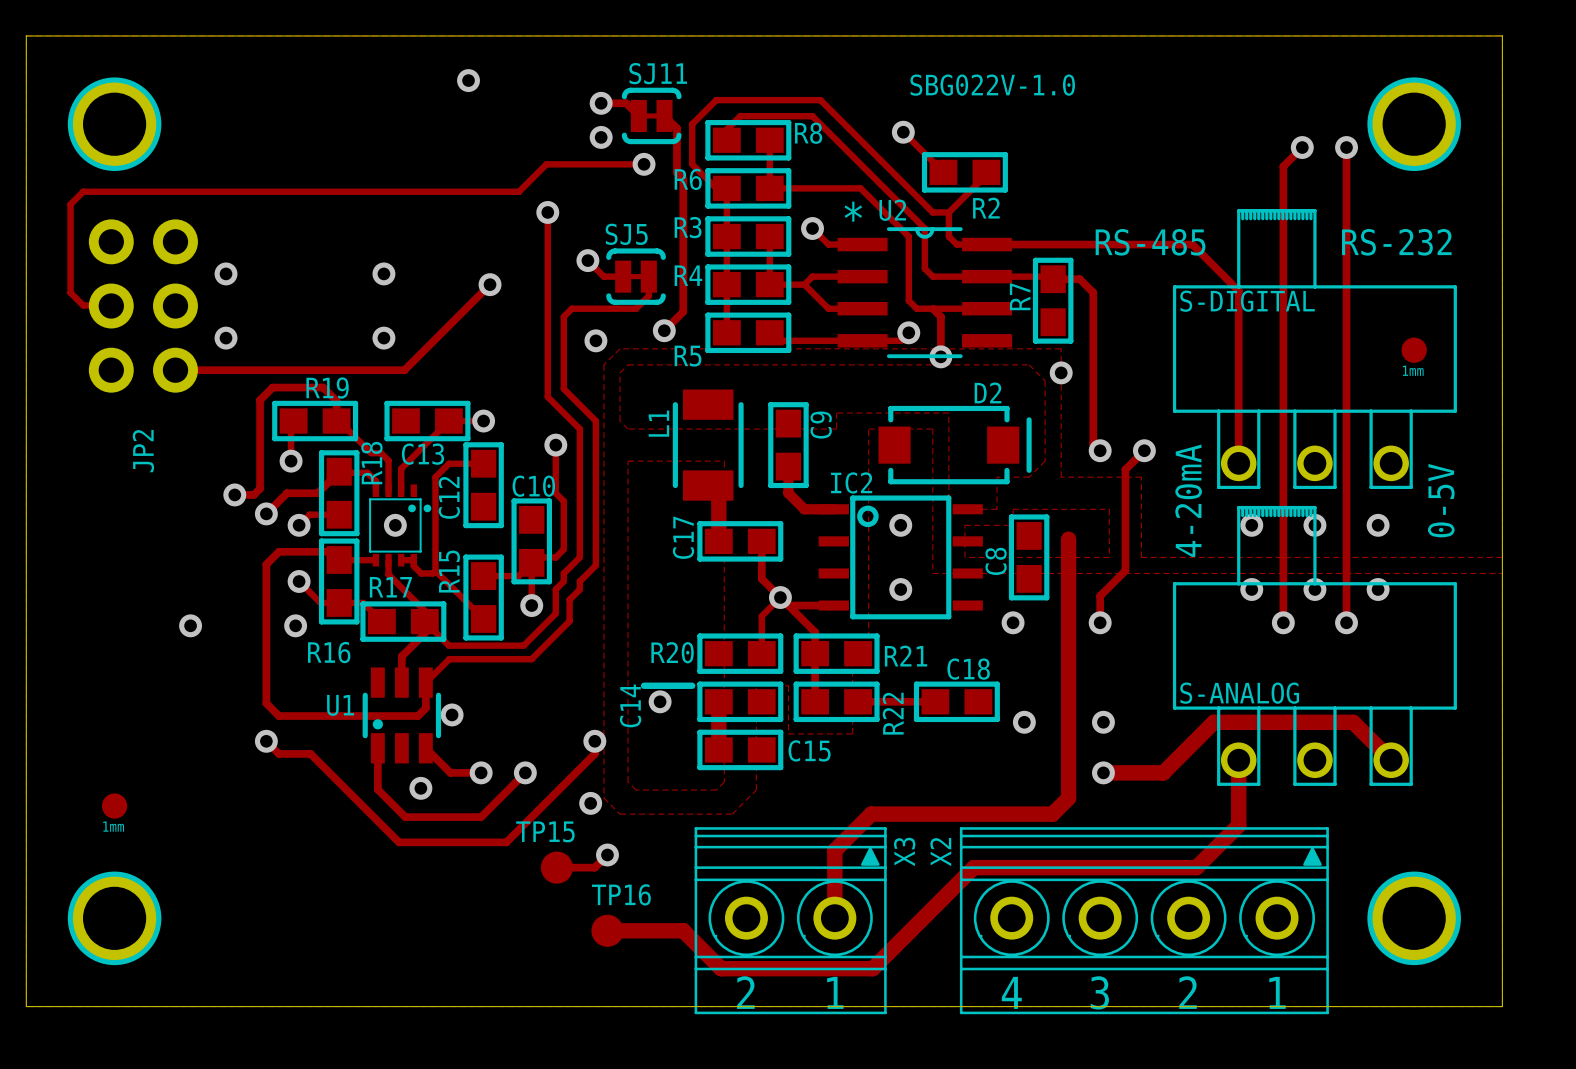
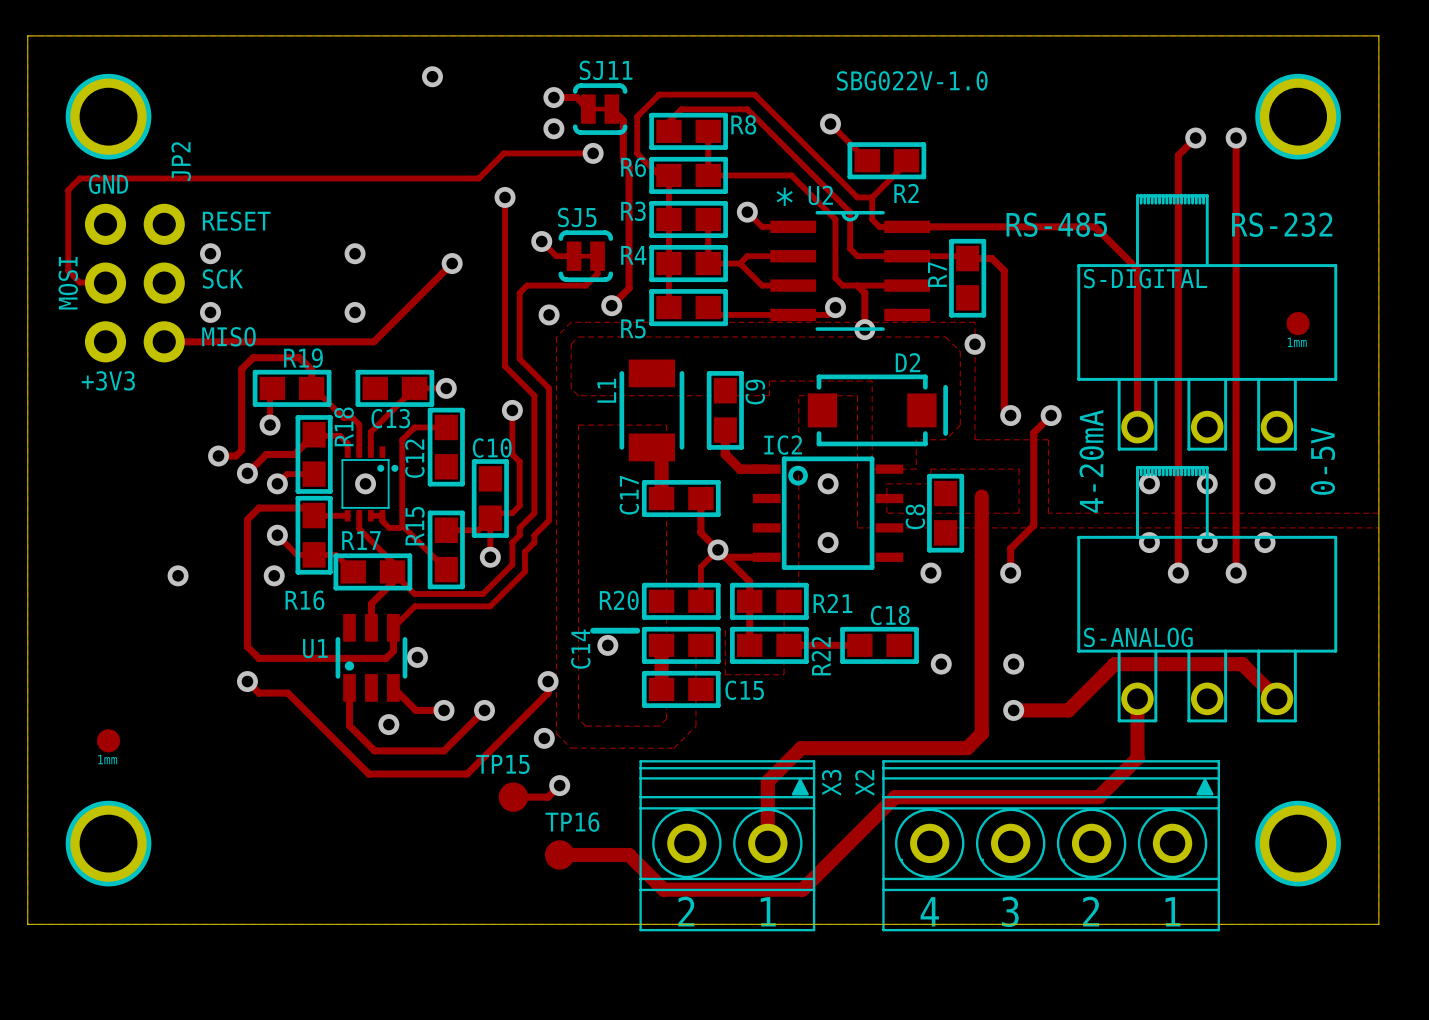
text: none -> GND (108, 184)
text: none -> RESET (236, 221)
text: none -> SCK (222, 278)
text: none -> MOSI (68, 283)
text: none -> MISO (228, 336)
text: none -> +3V3 (108, 380)
JP2 name position: JP2 (143, 451) -> JP2 (181, 161)

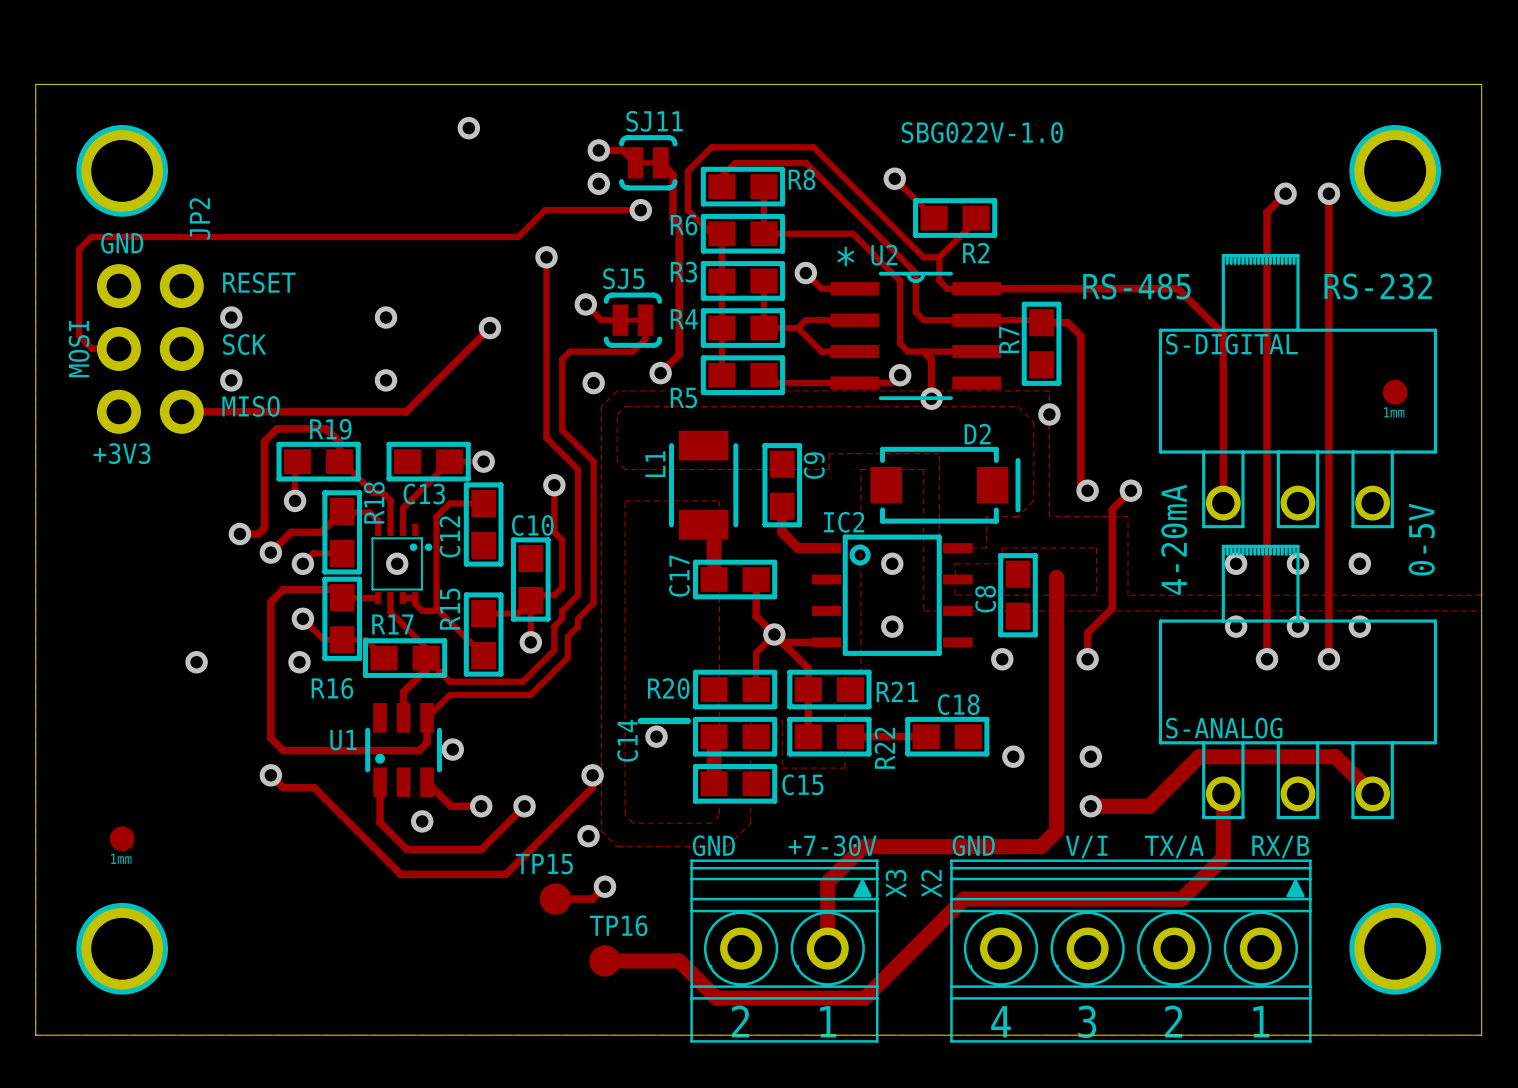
text: none -> GND (713, 845)
text: none -> +7-30V (832, 845)
text: none -> GND (973, 845)
text: none -> V/I (1086, 847)
text: none -> TX/A (1174, 847)
text: none -> RX/B (1280, 847)

